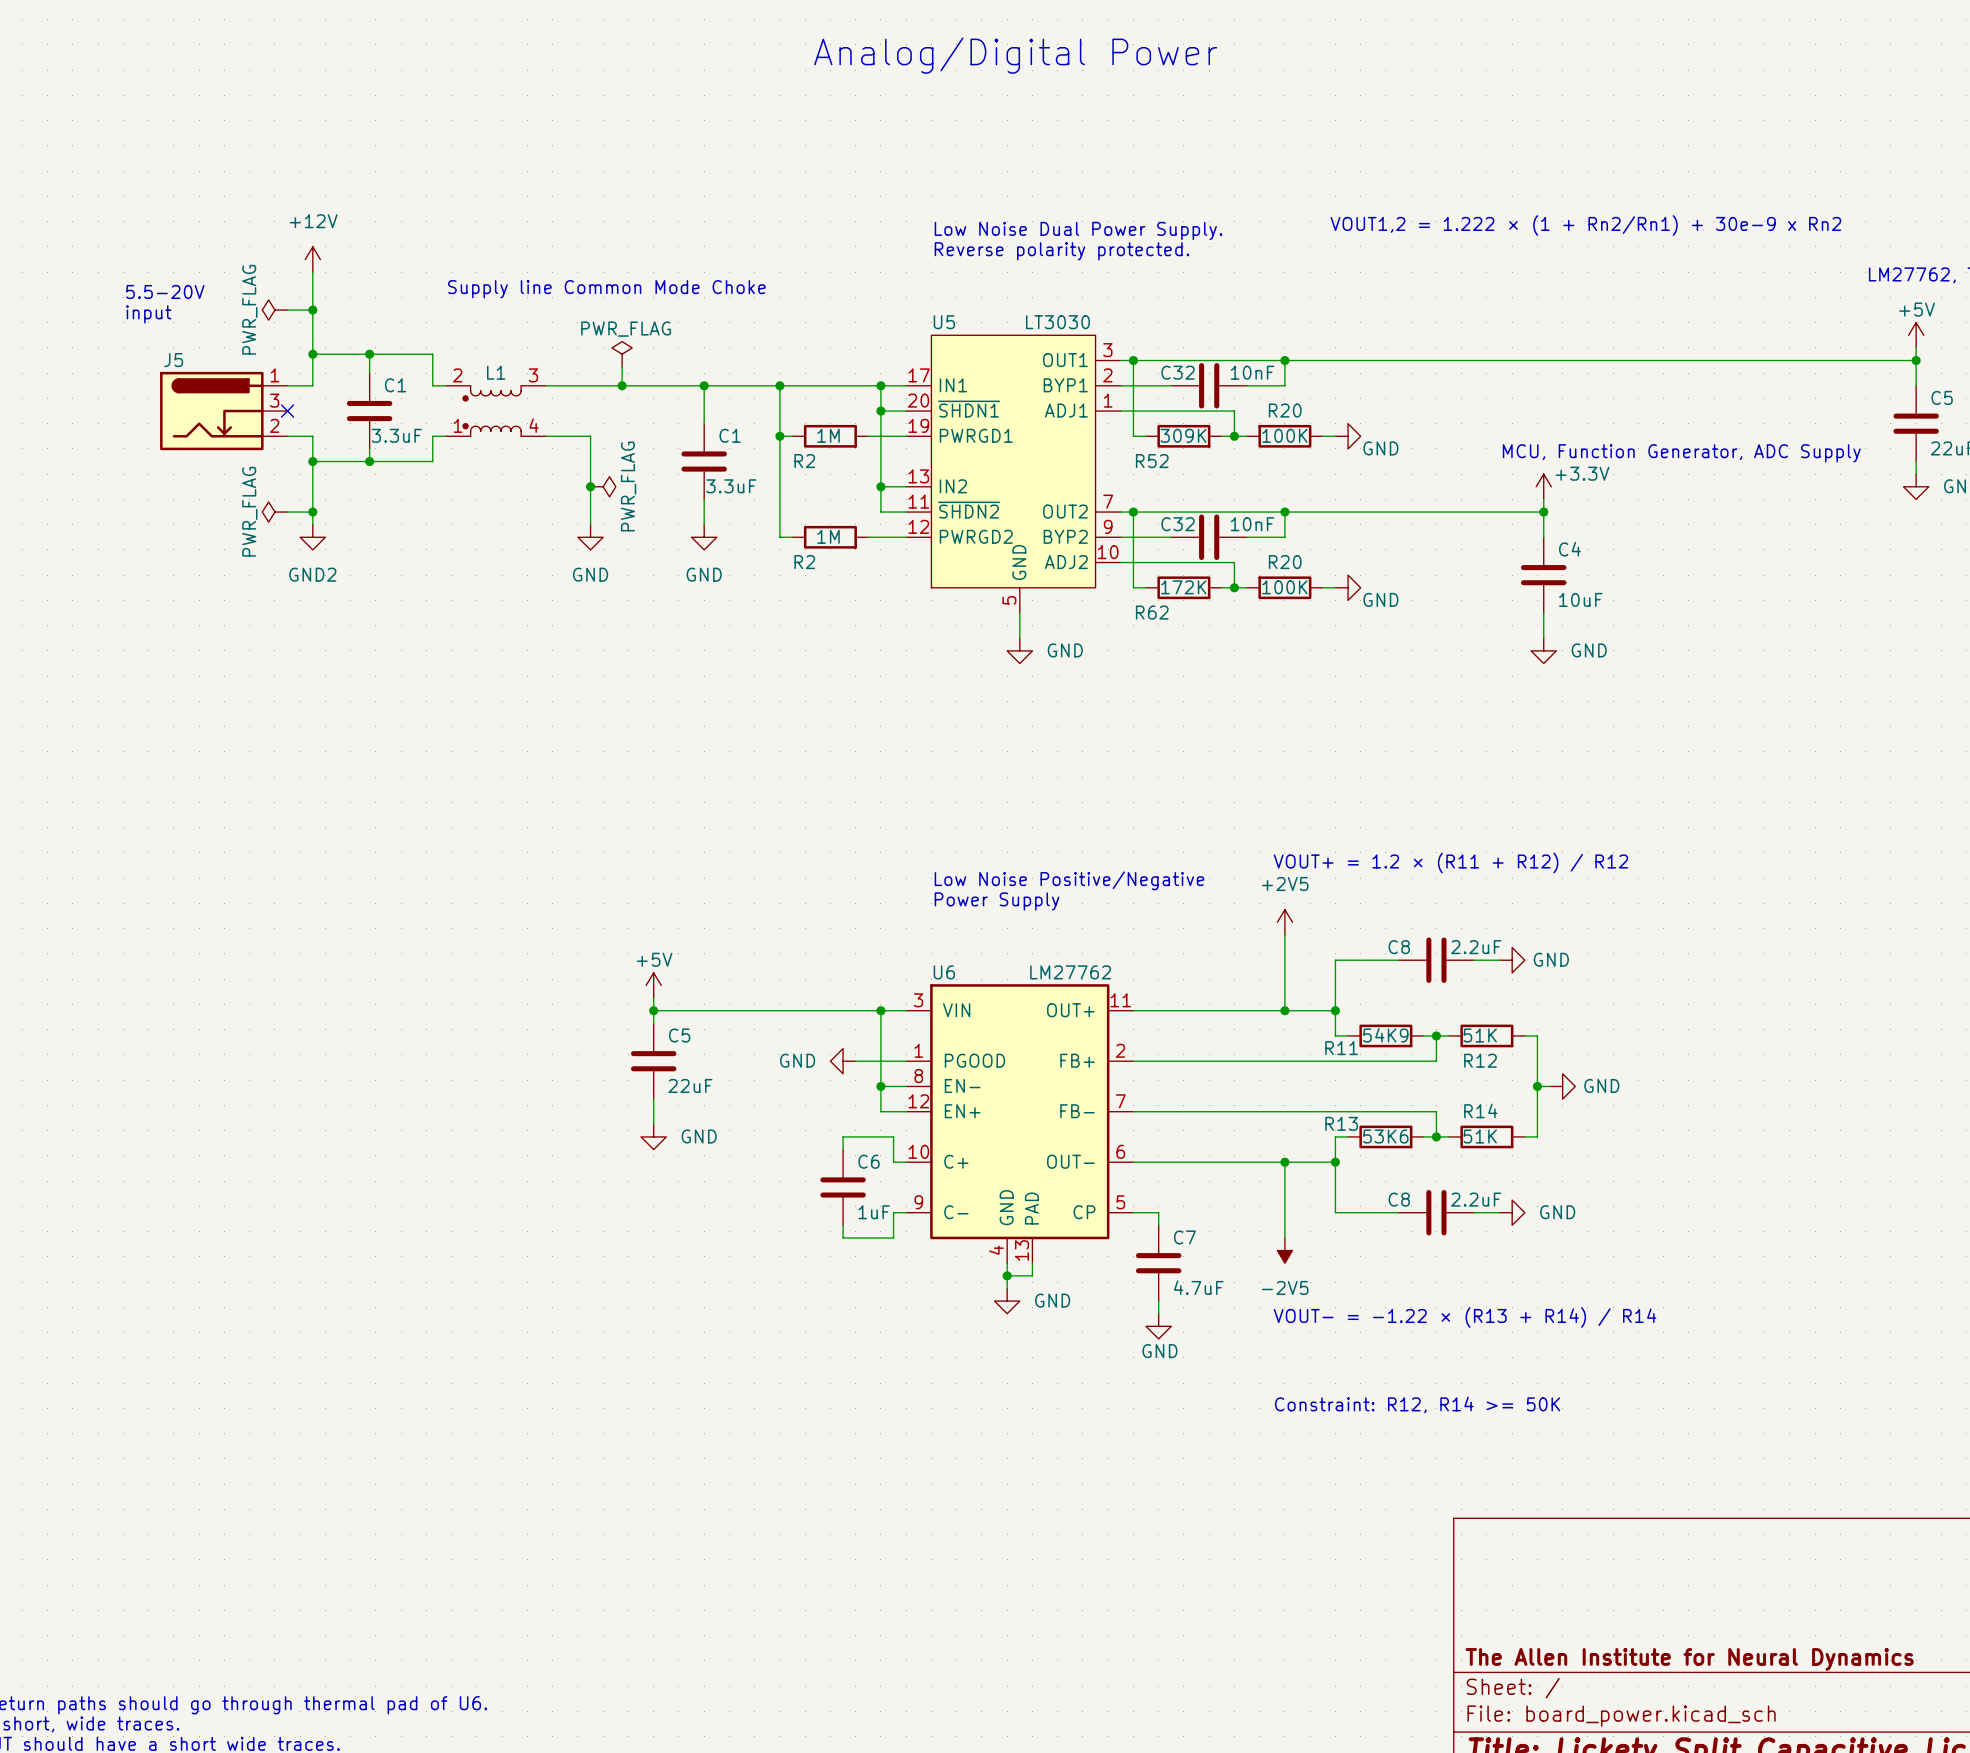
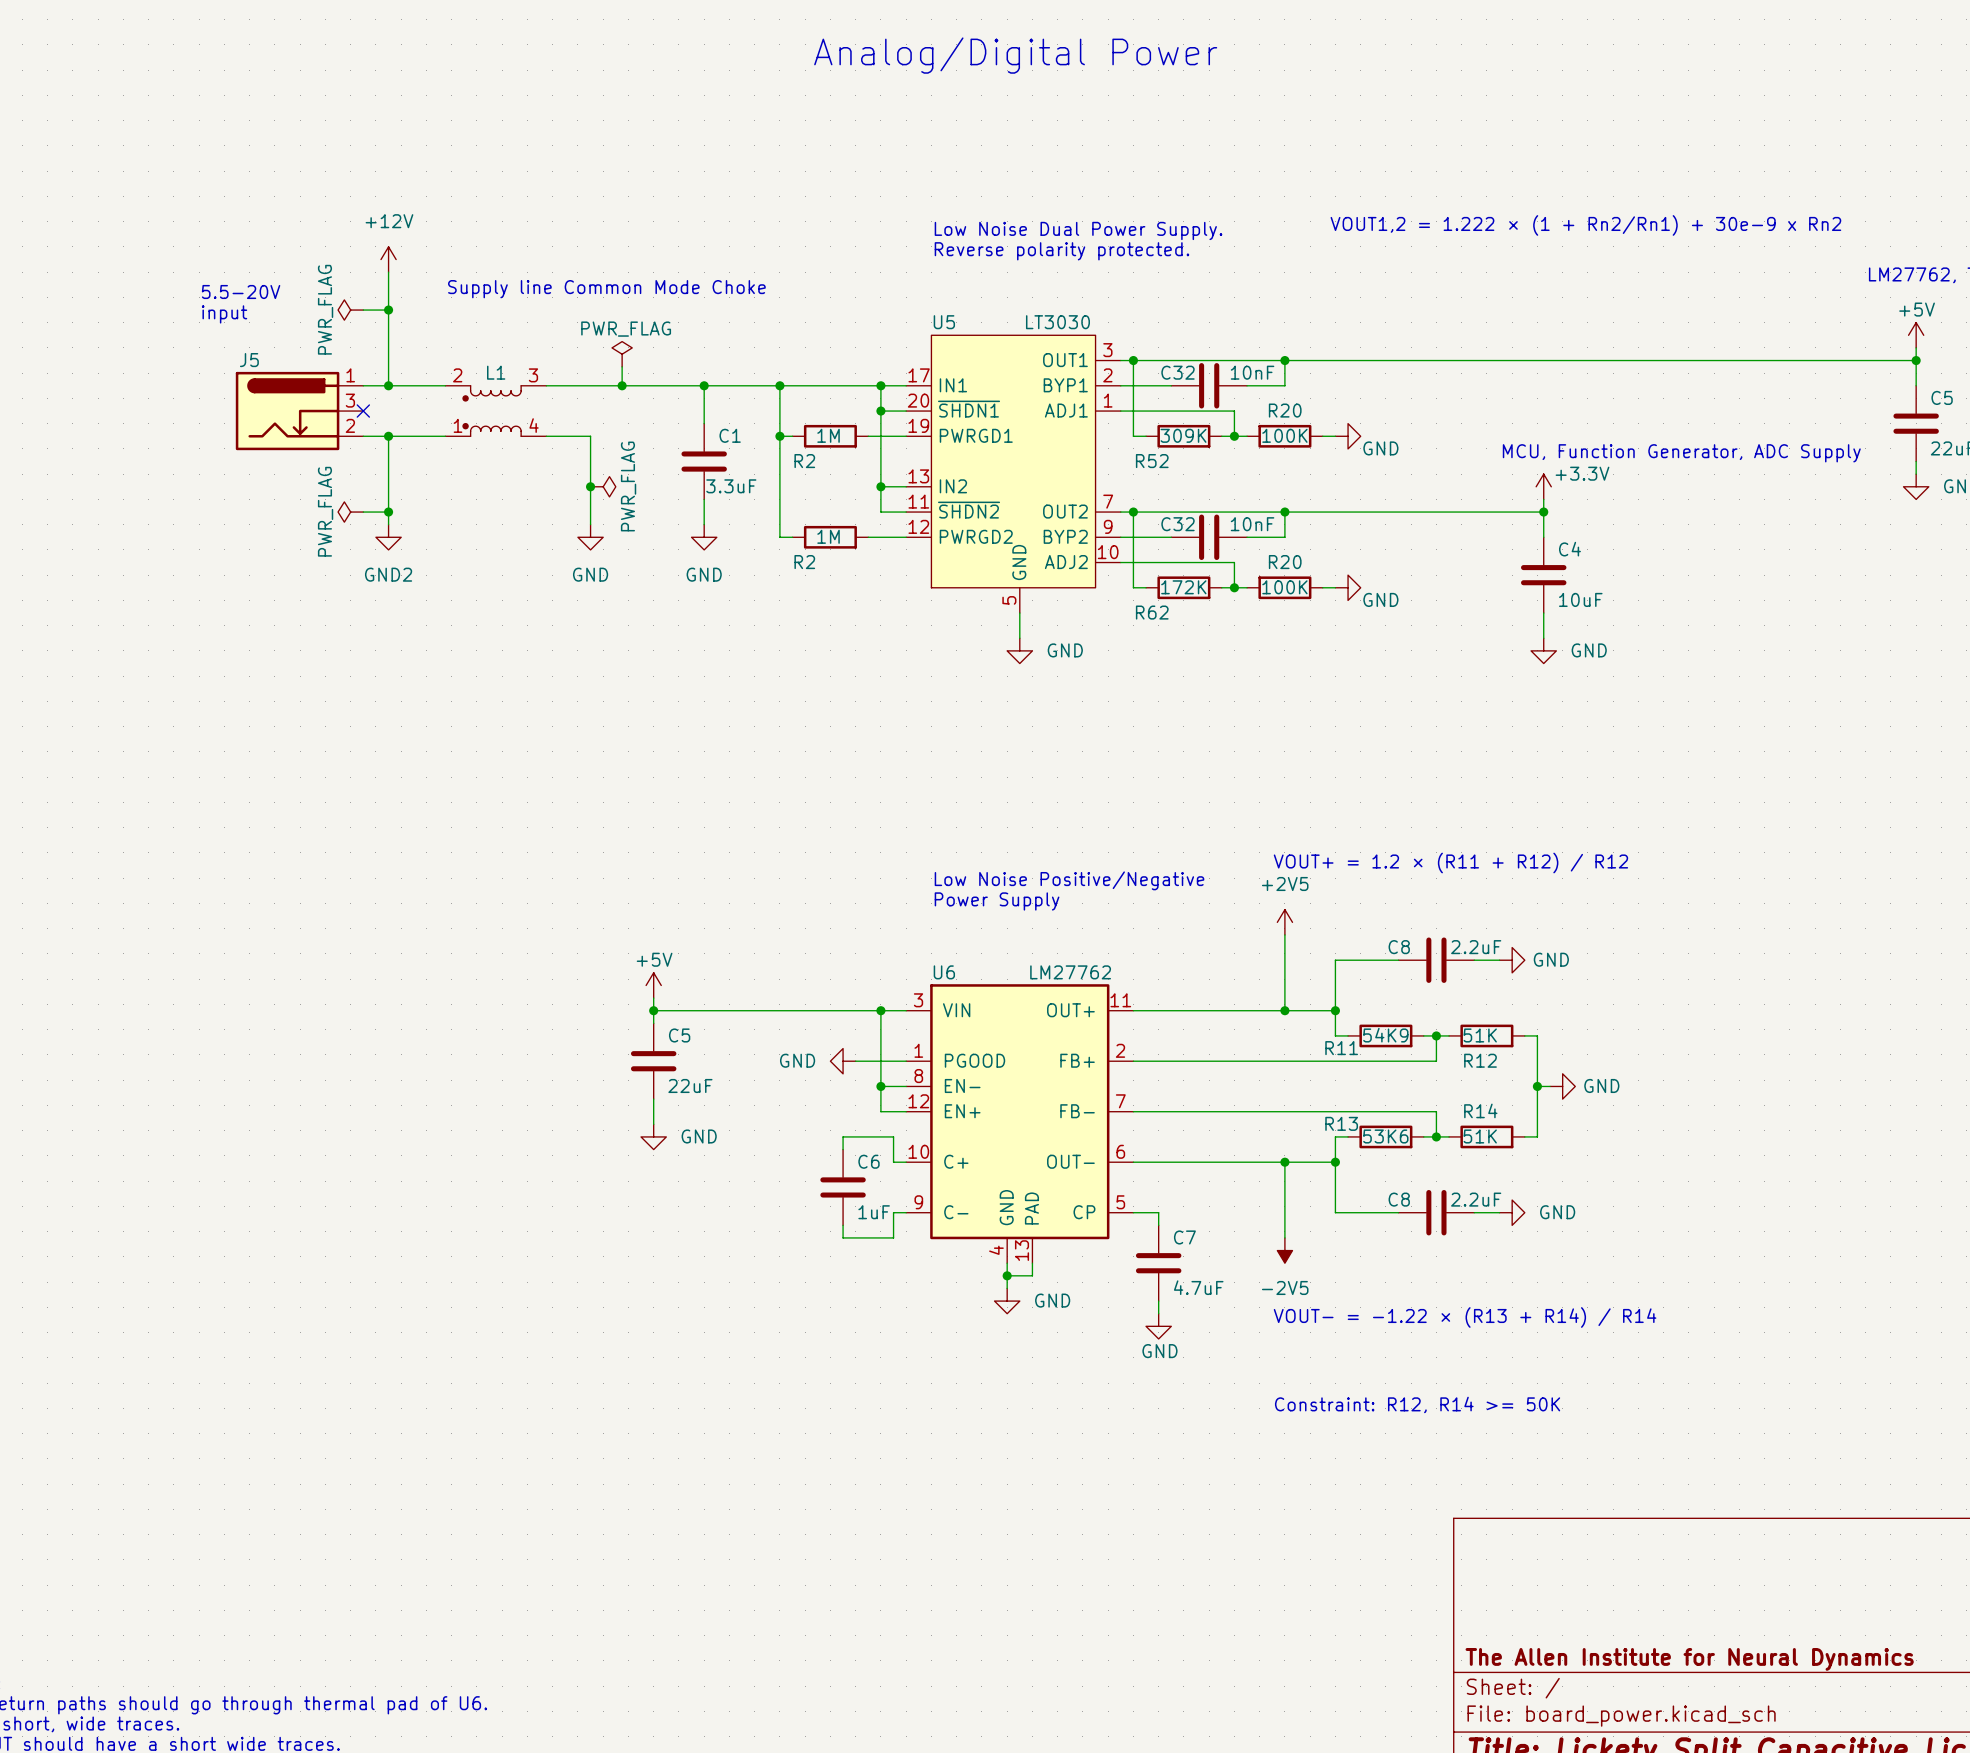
power symbol position: +12V (312, 259) -> +12V (388, 259)
wire: (312, 272) (312, 385) (287, 385) -> none
wire: none -> (388, 272) (388, 385)
text position: 5.5-20V (165, 291) -> 5.5-20V (241, 291)
power symbol position: PWR_FLAG (274, 310) -> PWR_FLAG (350, 310)
wire: (287, 310) (312, 310) -> (363, 310) (388, 310)
junction: (312, 310) -> none
junction: none -> (388, 310)
text position: input (148, 314) -> input (224, 314)
wire: (312, 354) (432, 354) (432, 385) -> (363, 385) (432, 385)
junction: (312, 354) -> none
wire: (369, 354) (369, 373) -> none
junction: (369, 354) -> none
junction: none -> (388, 385)
J5 position: (223, 411) -> (299, 411)
no-connect mark: (287, 411) -> none
no-connect mark: none -> (363, 411)
C1: 3.3uF (369, 411) -> none
wire: (287, 436) (312, 436) (312, 524) -> none
wire: none -> (388, 436) (388, 524)
junction: none -> (388, 436)
wire: (432, 436) (432, 461) (312, 461) -> (432, 436) (363, 436)
wire: (369, 448) (369, 461) -> none
junction: (312, 461) -> none
junction: (369, 461) -> none
power symbol position: PWR_FLAG (274, 512) -> PWR_FLAG (350, 512)
wire: (287, 512) (312, 512) -> (363, 512) (388, 512)
junction: (312, 512) -> none
junction: none -> (388, 512)
power symbol position: GND2 (312, 537) -> GND2 (388, 537)

